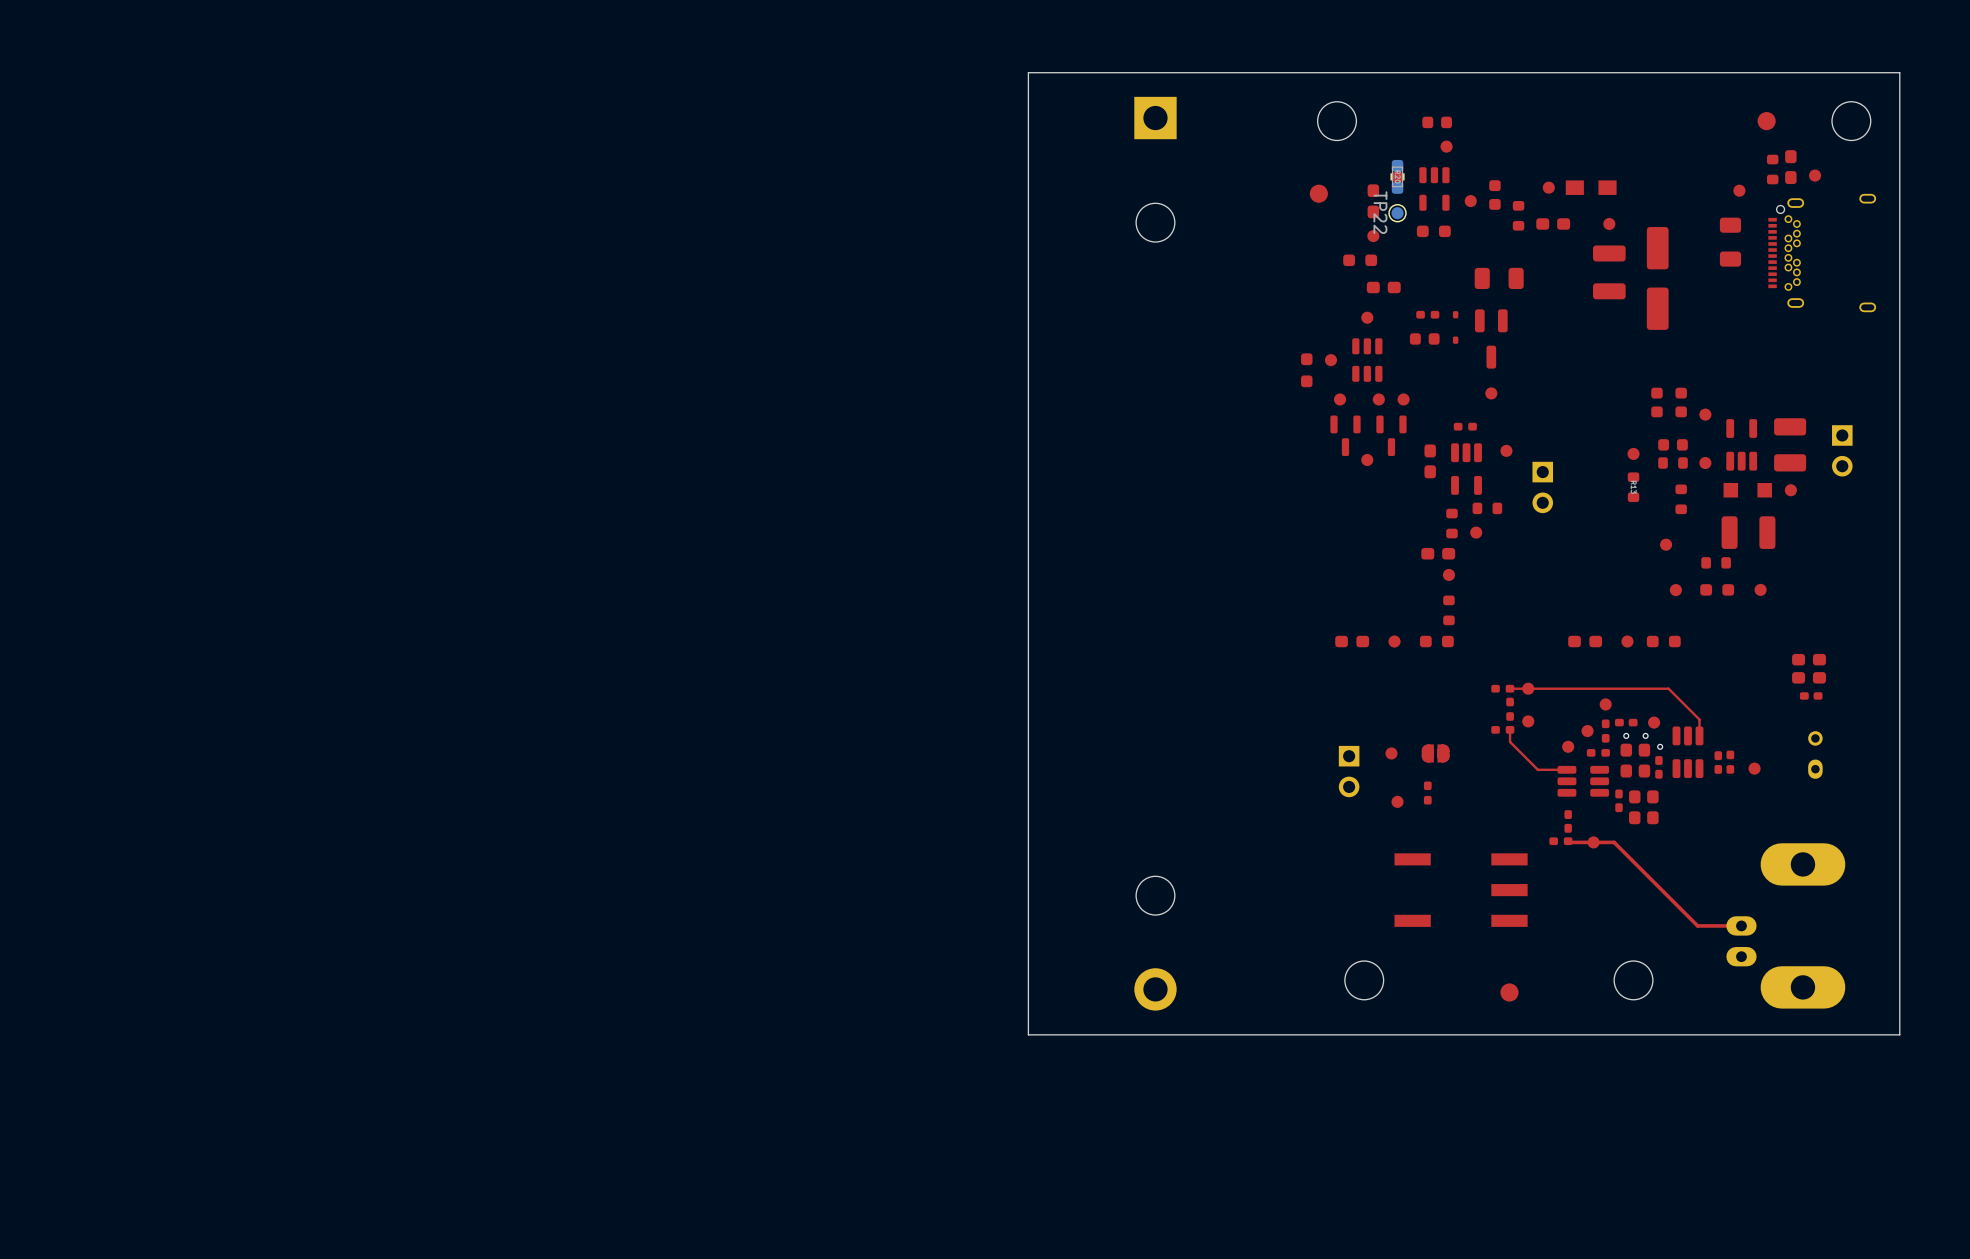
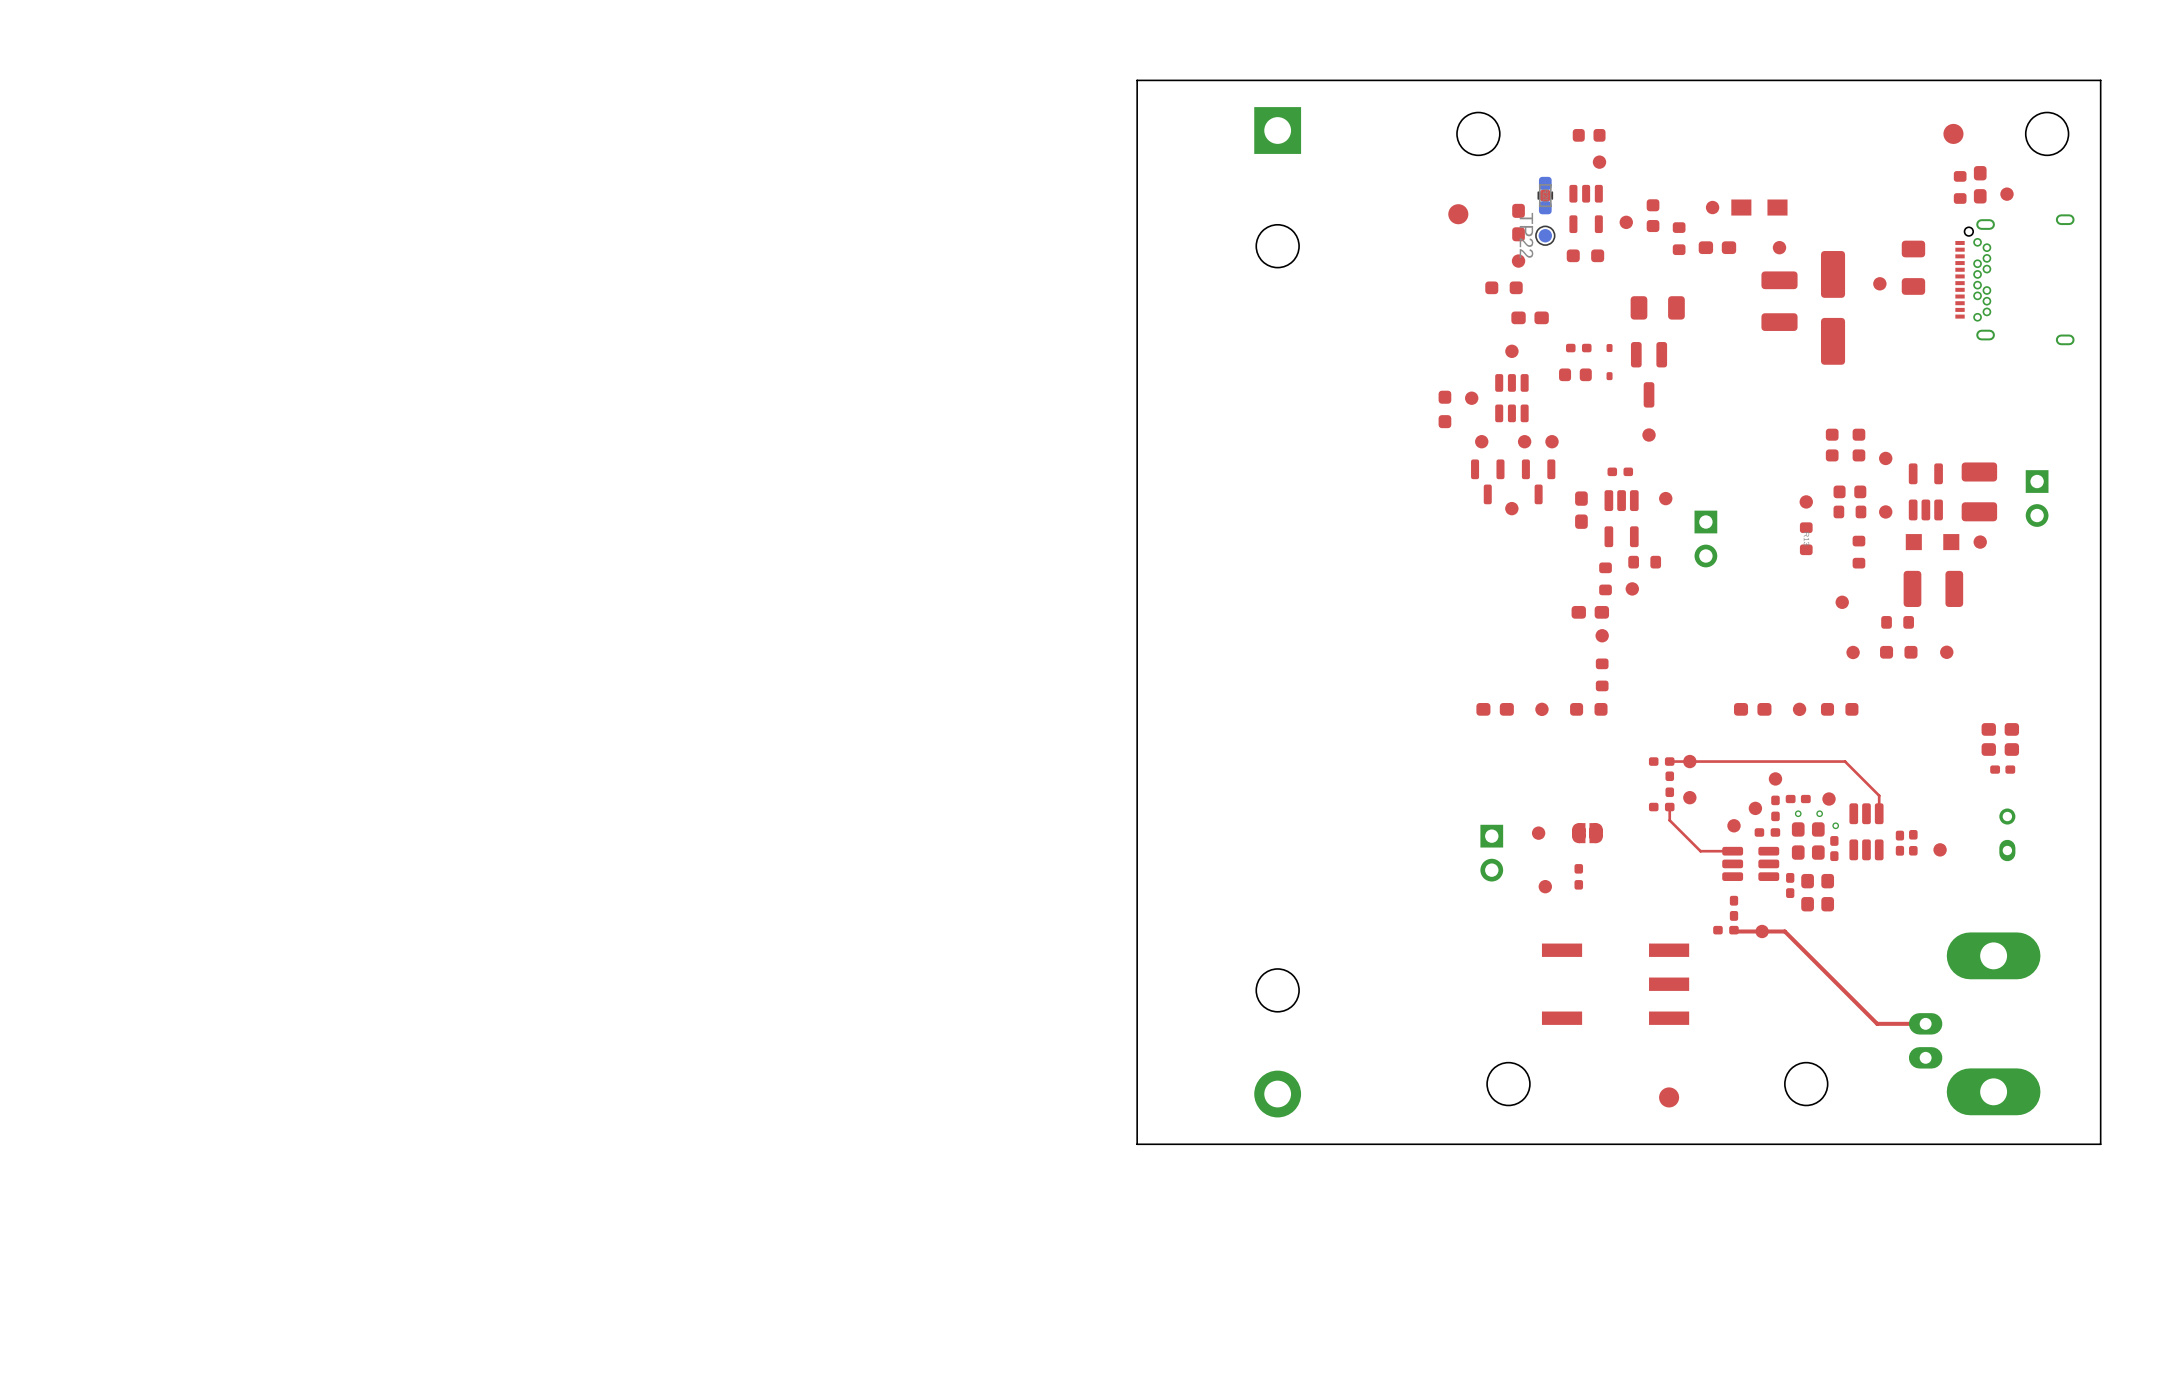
part position: (1739, 190) -> (1879, 283)

